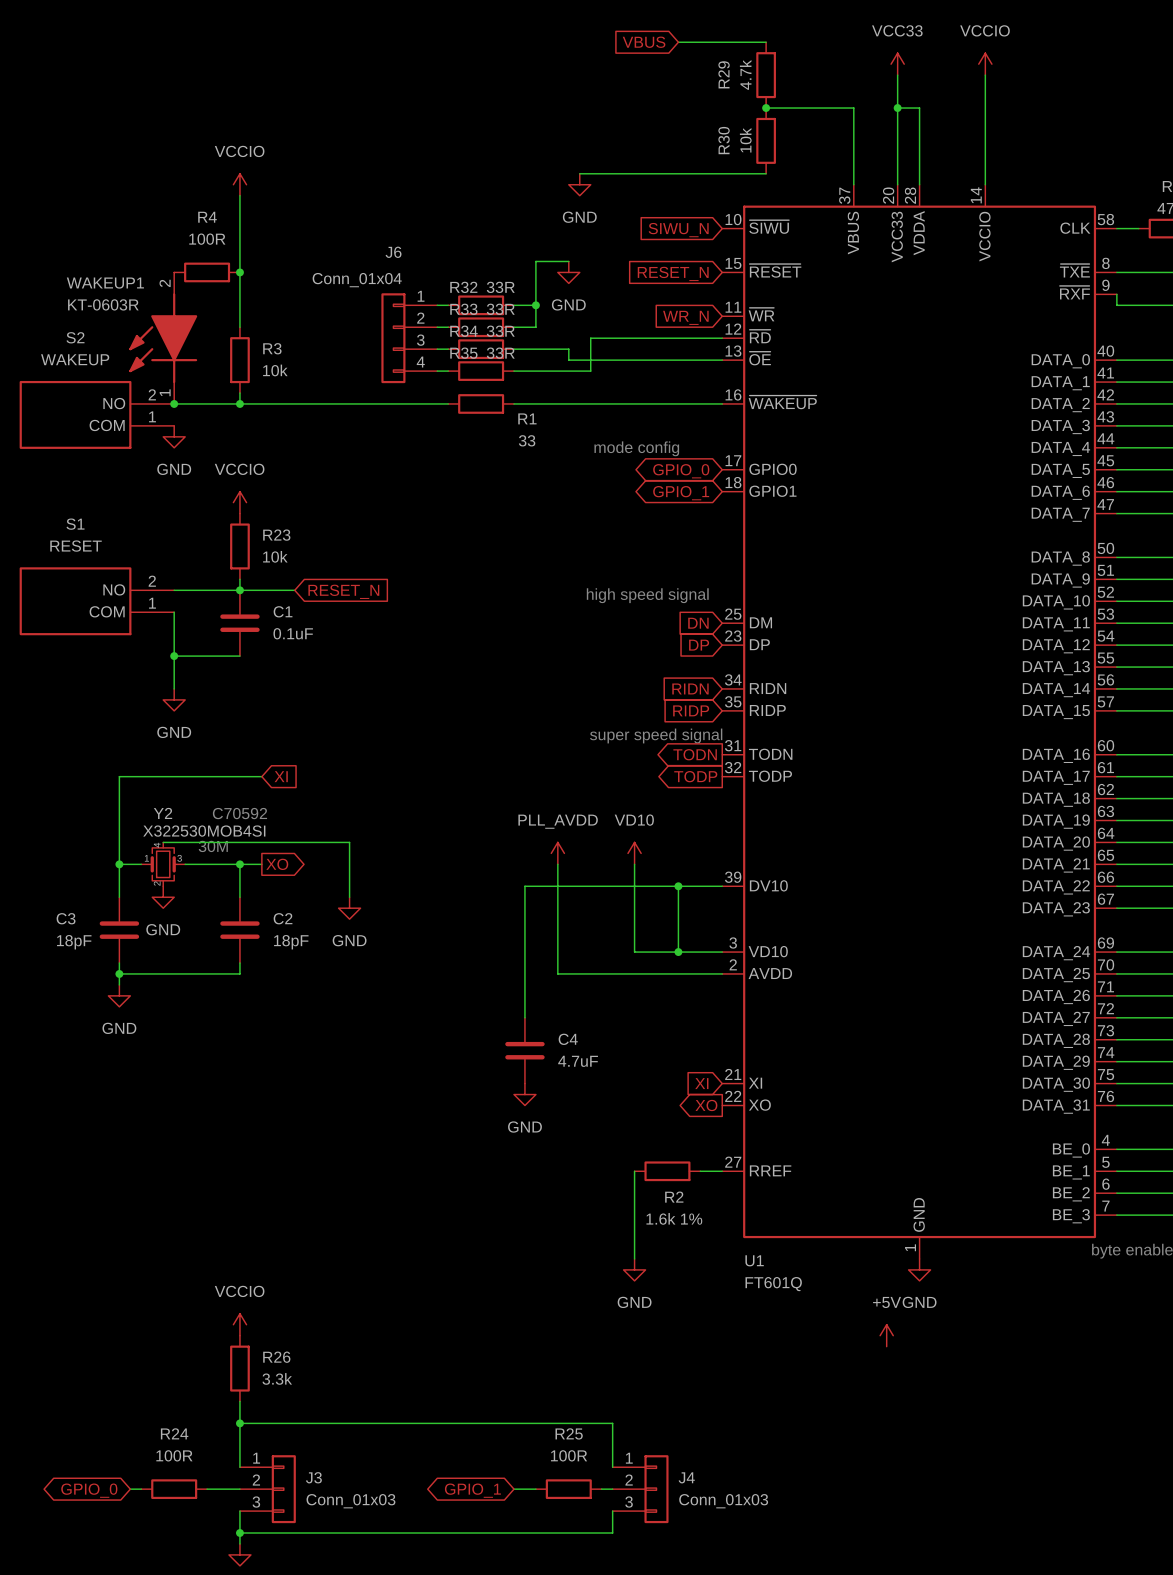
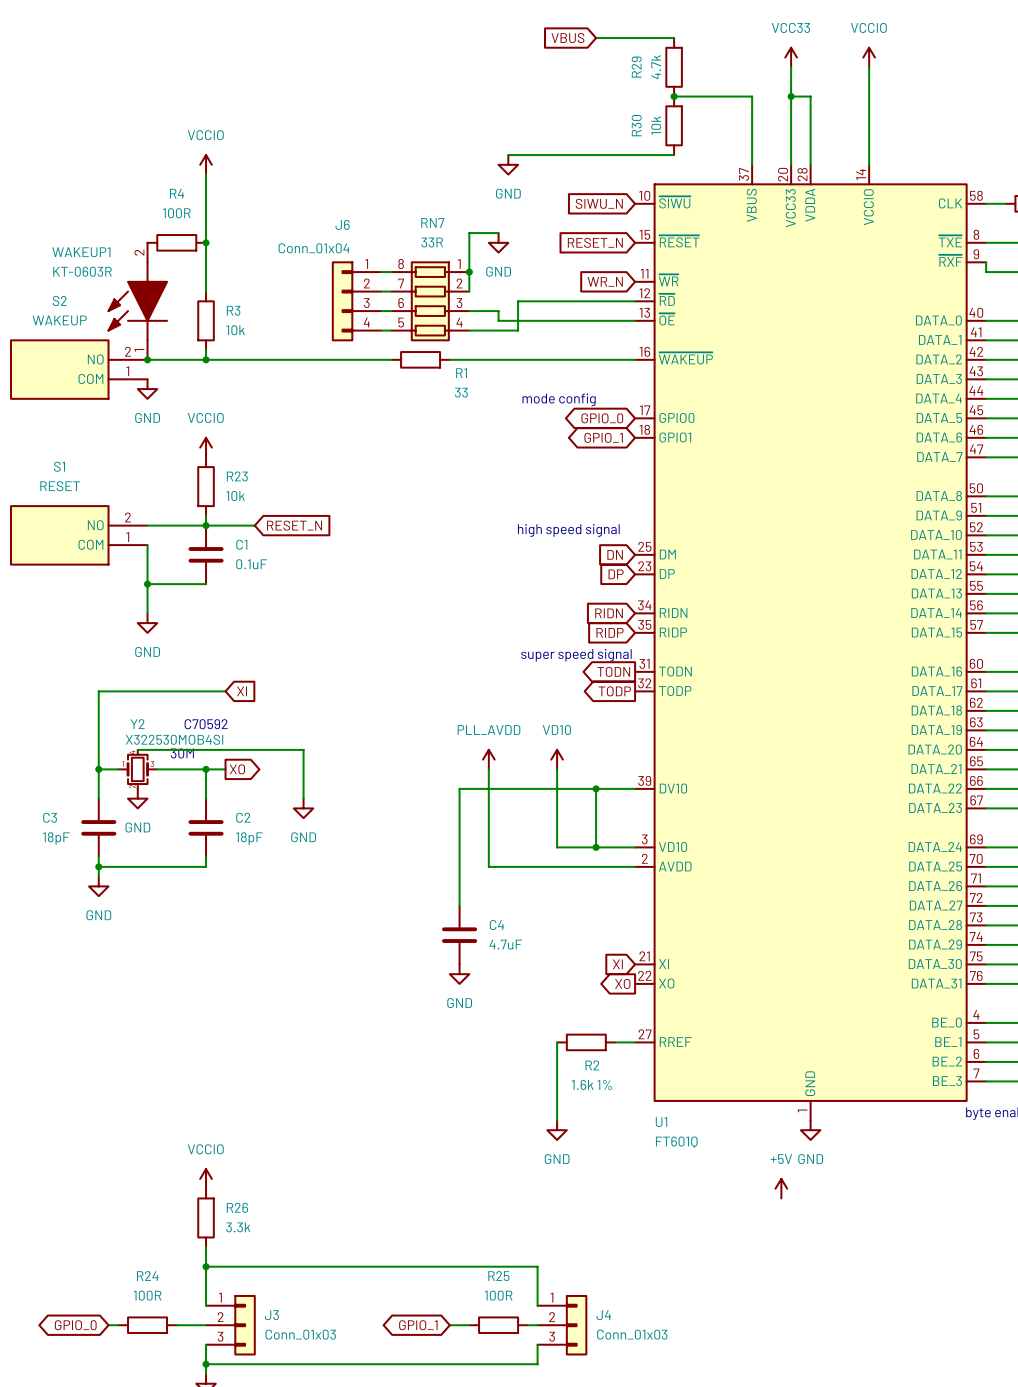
R32: 33R (481, 305) -> none
R33: 33R (481, 327) -> none
RN7: none -> 33R (430, 301)
R34: 33R (481, 349) -> none
R35: 33R (481, 371) -> none

